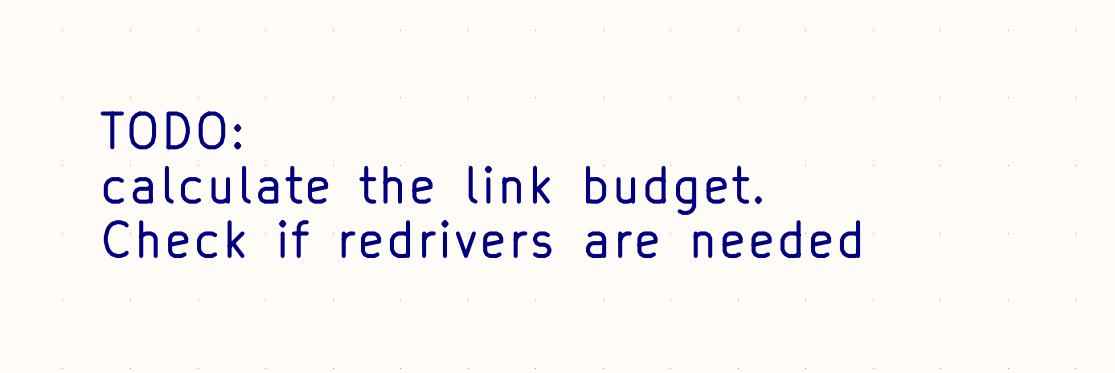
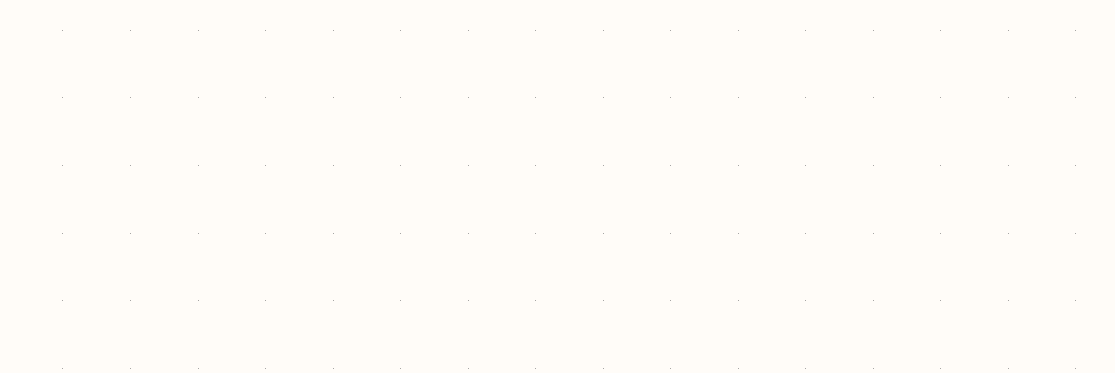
text: TODO: (170, 130) -> none
text: calculate the link budget. (432, 190) -> none
text: Check if redrivers are needed (481, 239) -> none

